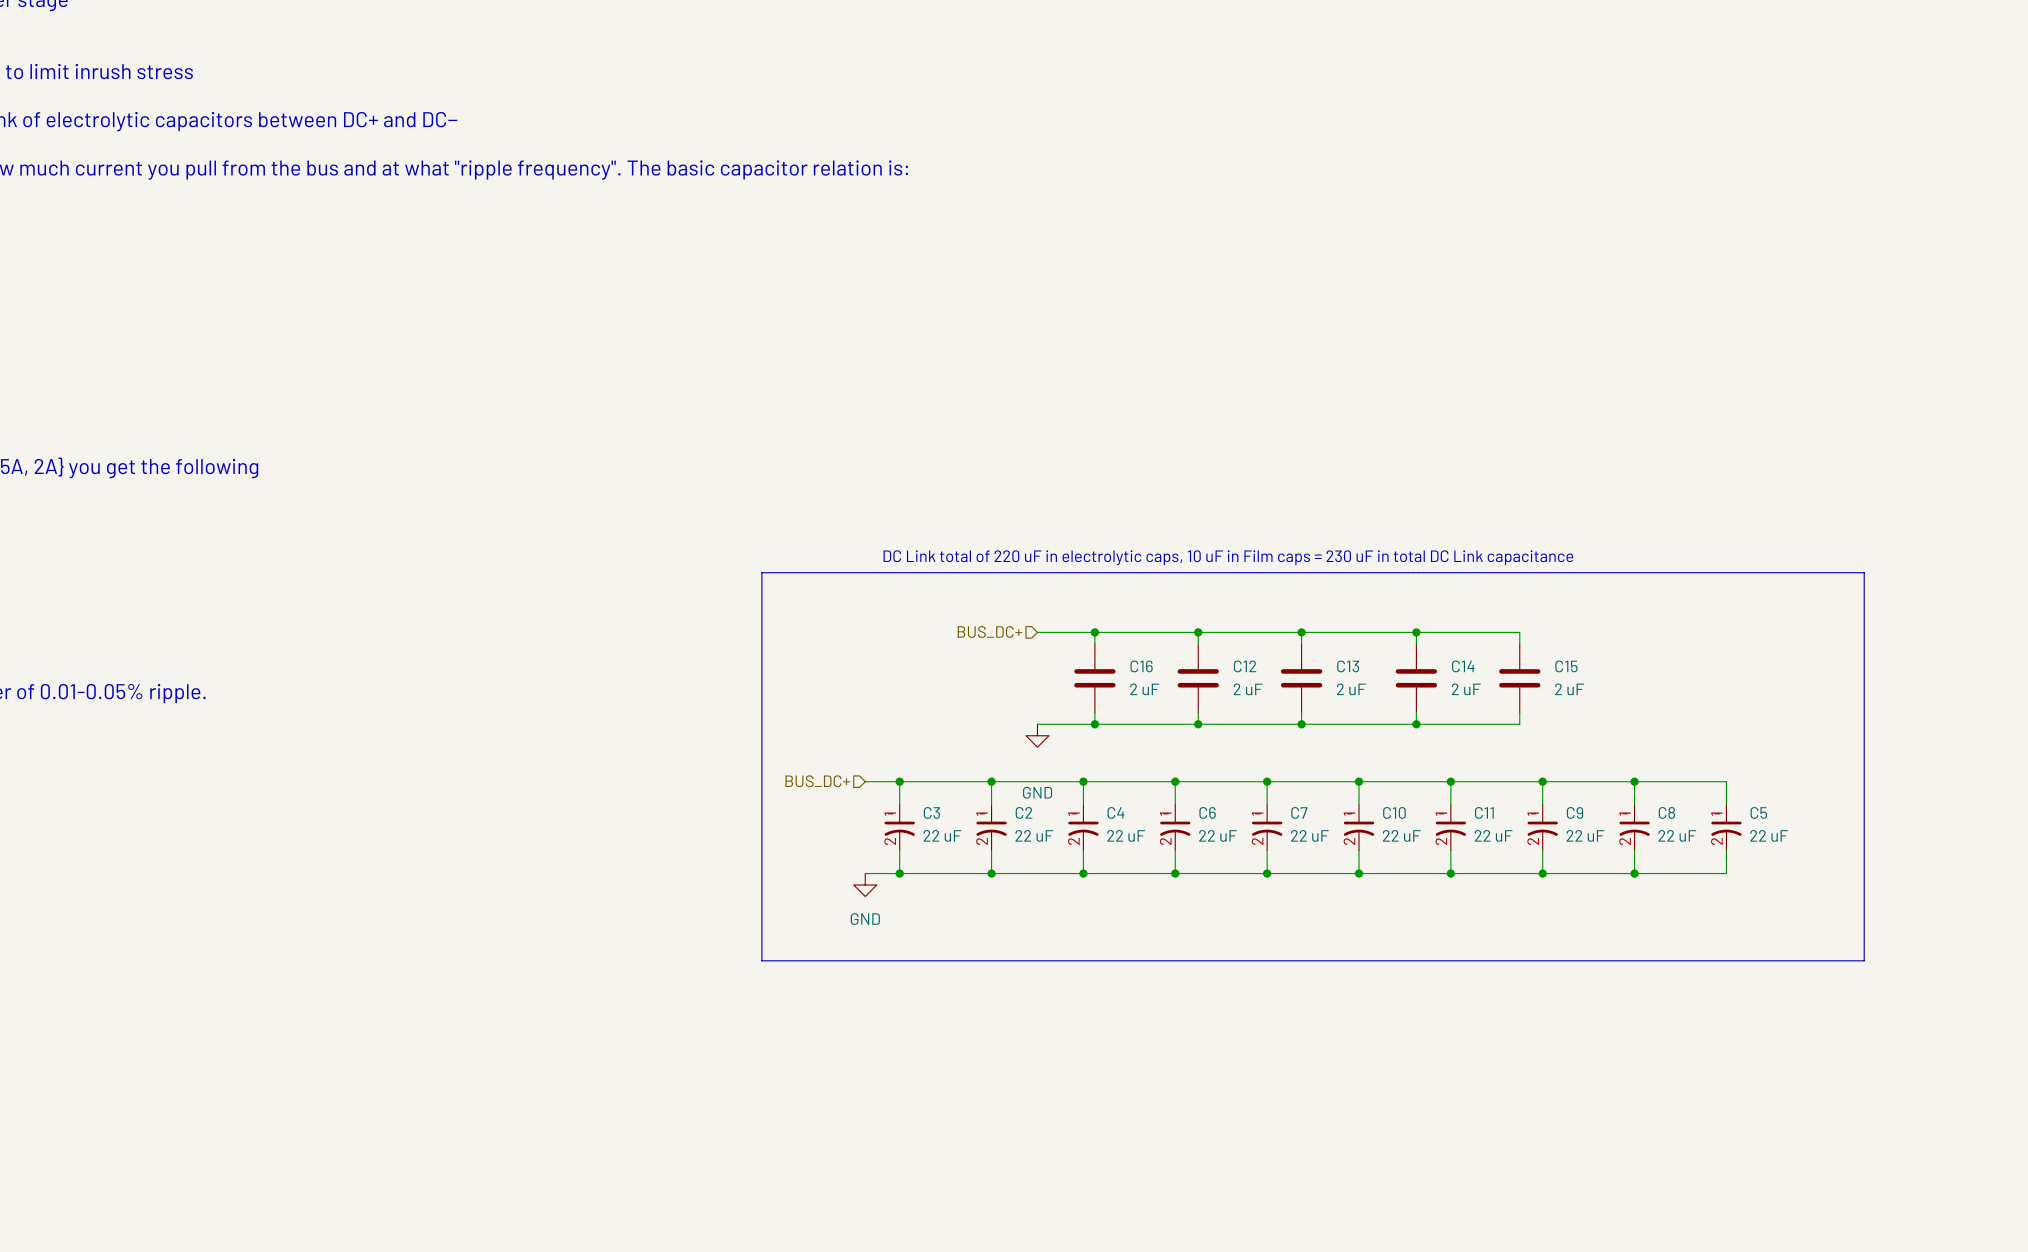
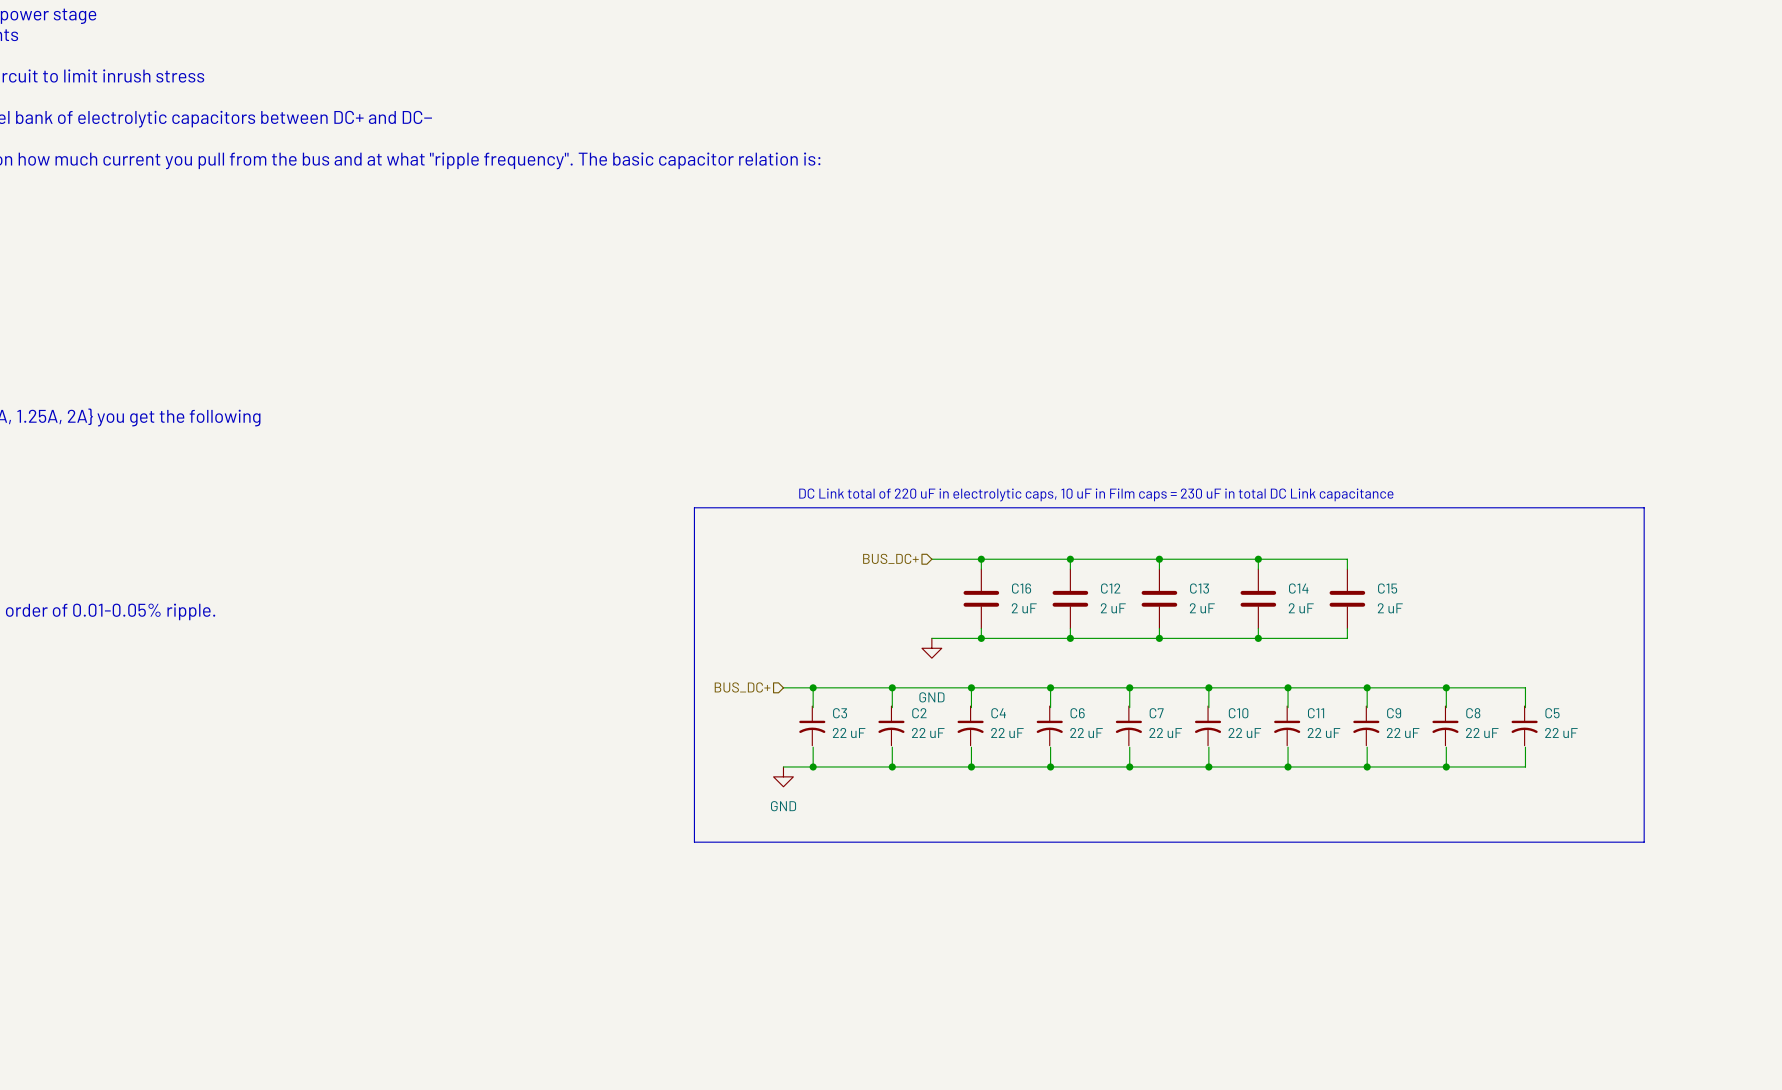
C3 symbol: [884, 804, 915, 851] -> [799, 706, 826, 746]
C2 symbol: [976, 804, 1007, 851] -> [878, 706, 905, 746]
C4 symbol: [1068, 804, 1099, 851] -> [957, 706, 984, 746]
C6 symbol: [1160, 804, 1191, 851] -> [1036, 706, 1063, 746]
C7 symbol: [1251, 804, 1283, 851] -> [1115, 706, 1142, 746]
C10 symbol: [1343, 804, 1375, 851] -> [1194, 706, 1222, 746]
C11 symbol: [1435, 804, 1467, 851] -> [1274, 706, 1301, 746]
C9 symbol: [1527, 804, 1558, 851] -> [1353, 706, 1380, 746]
C8 symbol: [1619, 804, 1650, 851] -> [1432, 706, 1459, 746]
C5 symbol: [1711, 804, 1742, 851] -> [1511, 706, 1538, 746]

